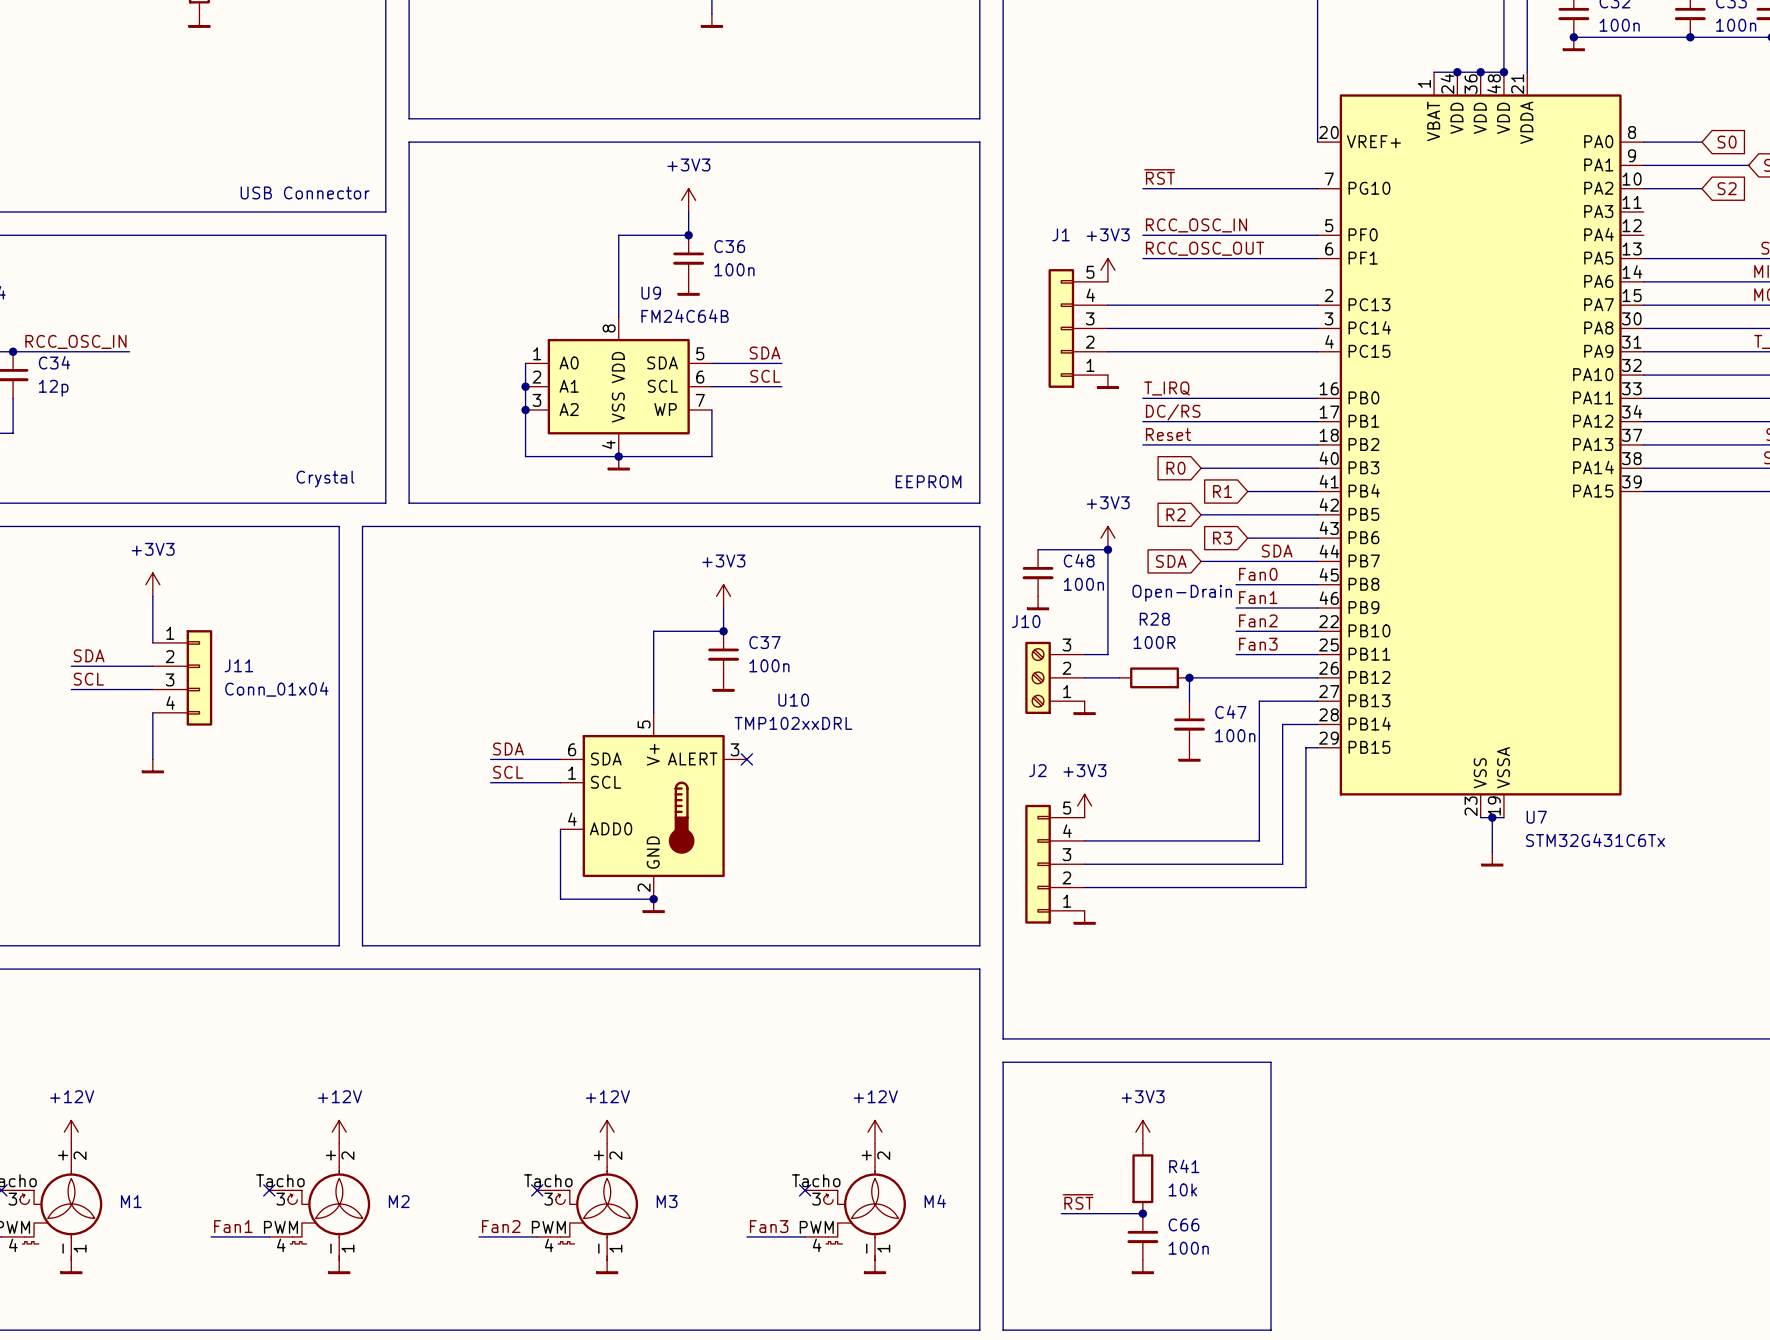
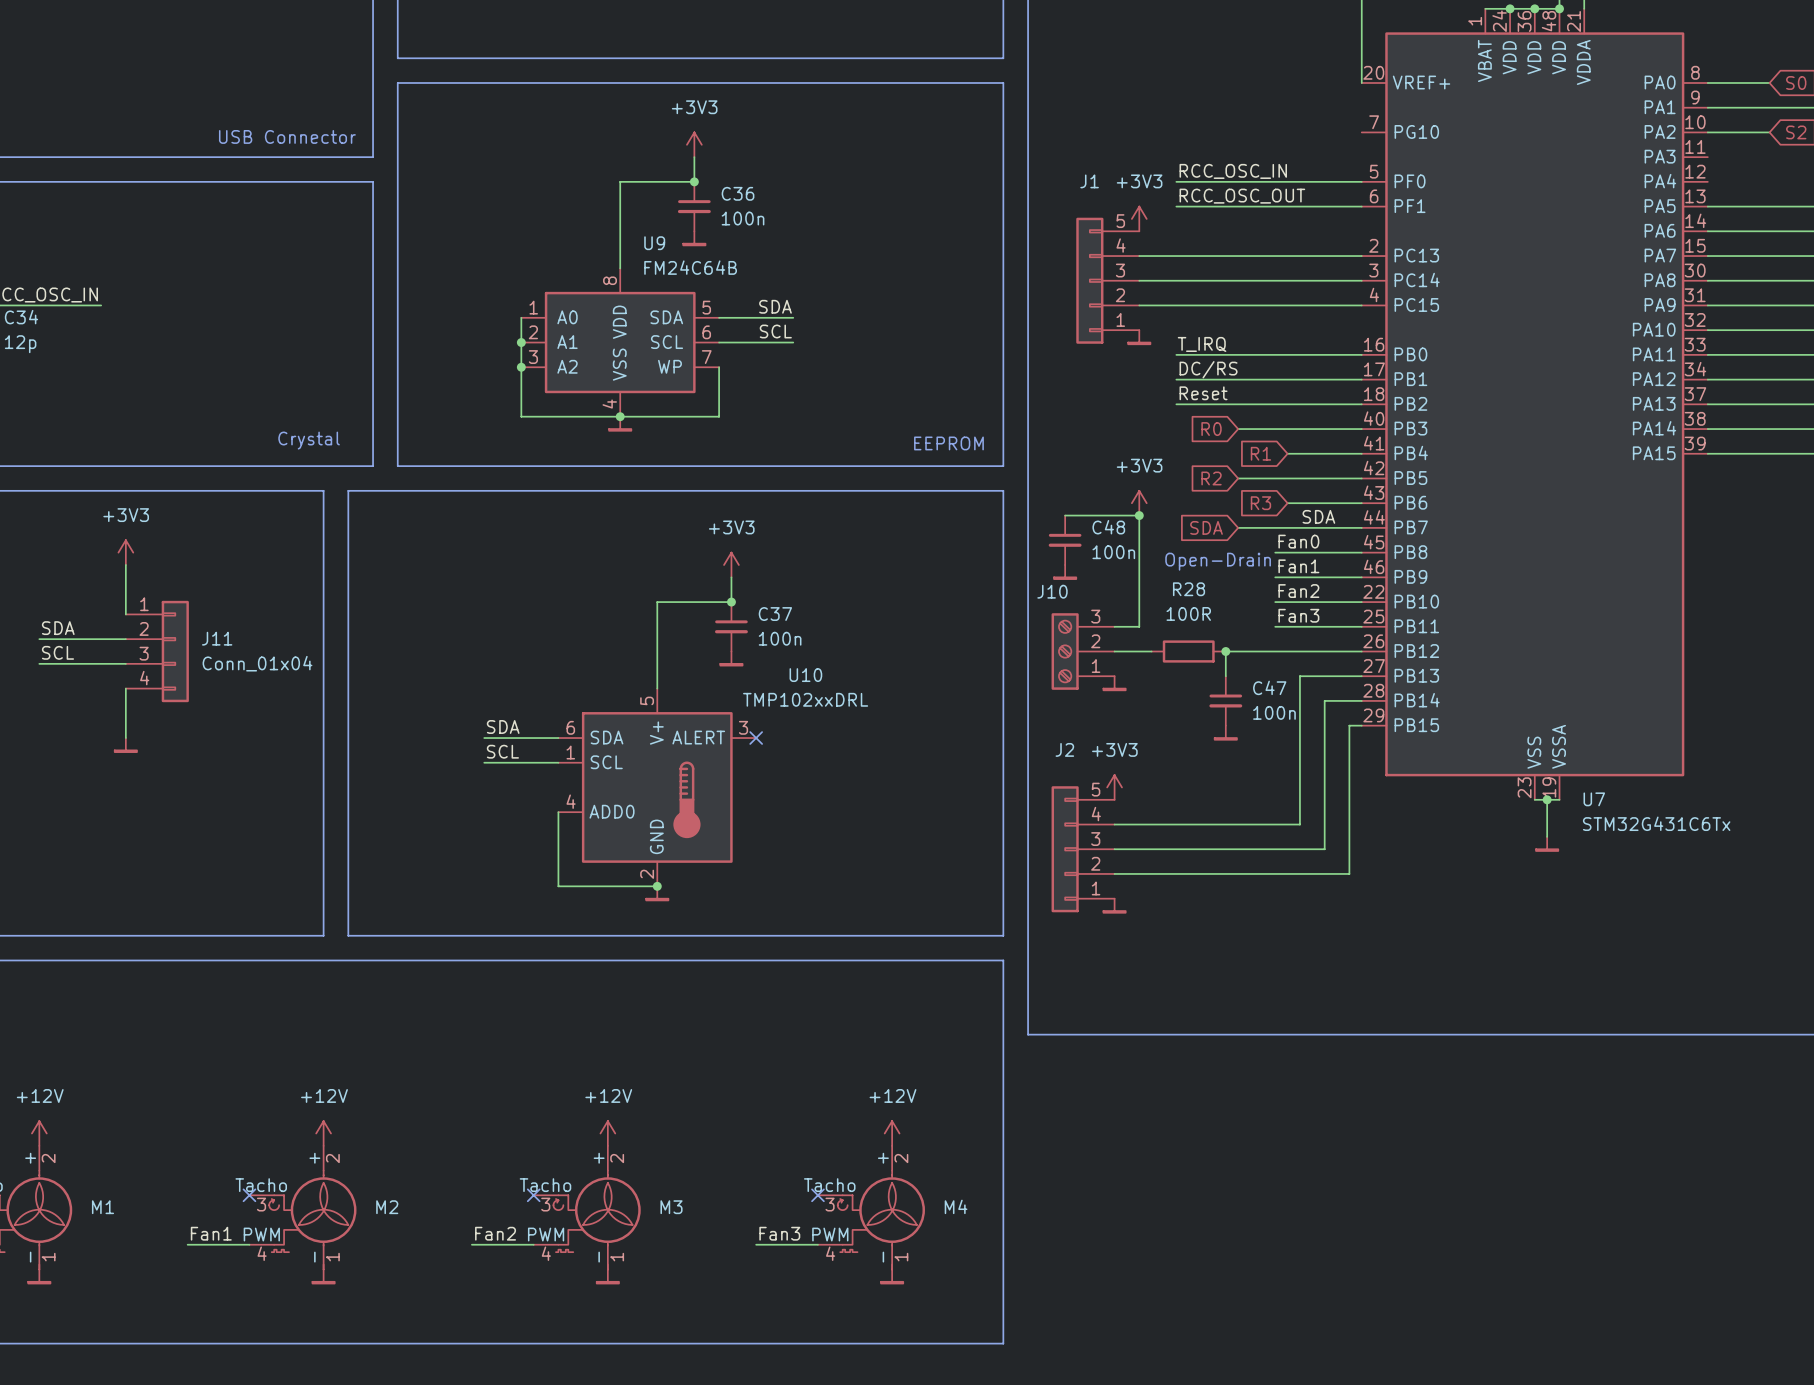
label: ~{RST} (1159, 176) -> none
wire: (1142, 188) (1317, 188) -> none
line: (1003, 1062) (1271, 1062) (1271, 1330) (1003, 1330) (1003, 1062) -> none
power symbol: +3V3 (1142, 1132) -> none
R41: 10k (1142, 1178) -> none
label: ~{RST} (1078, 1201) -> none
wire: (1061, 1213) (1142, 1213) -> none
junction: (1142, 1213) -> none
C66: 100n (1142, 1236) -> none
power symbol: (1142, 1266) -> none

